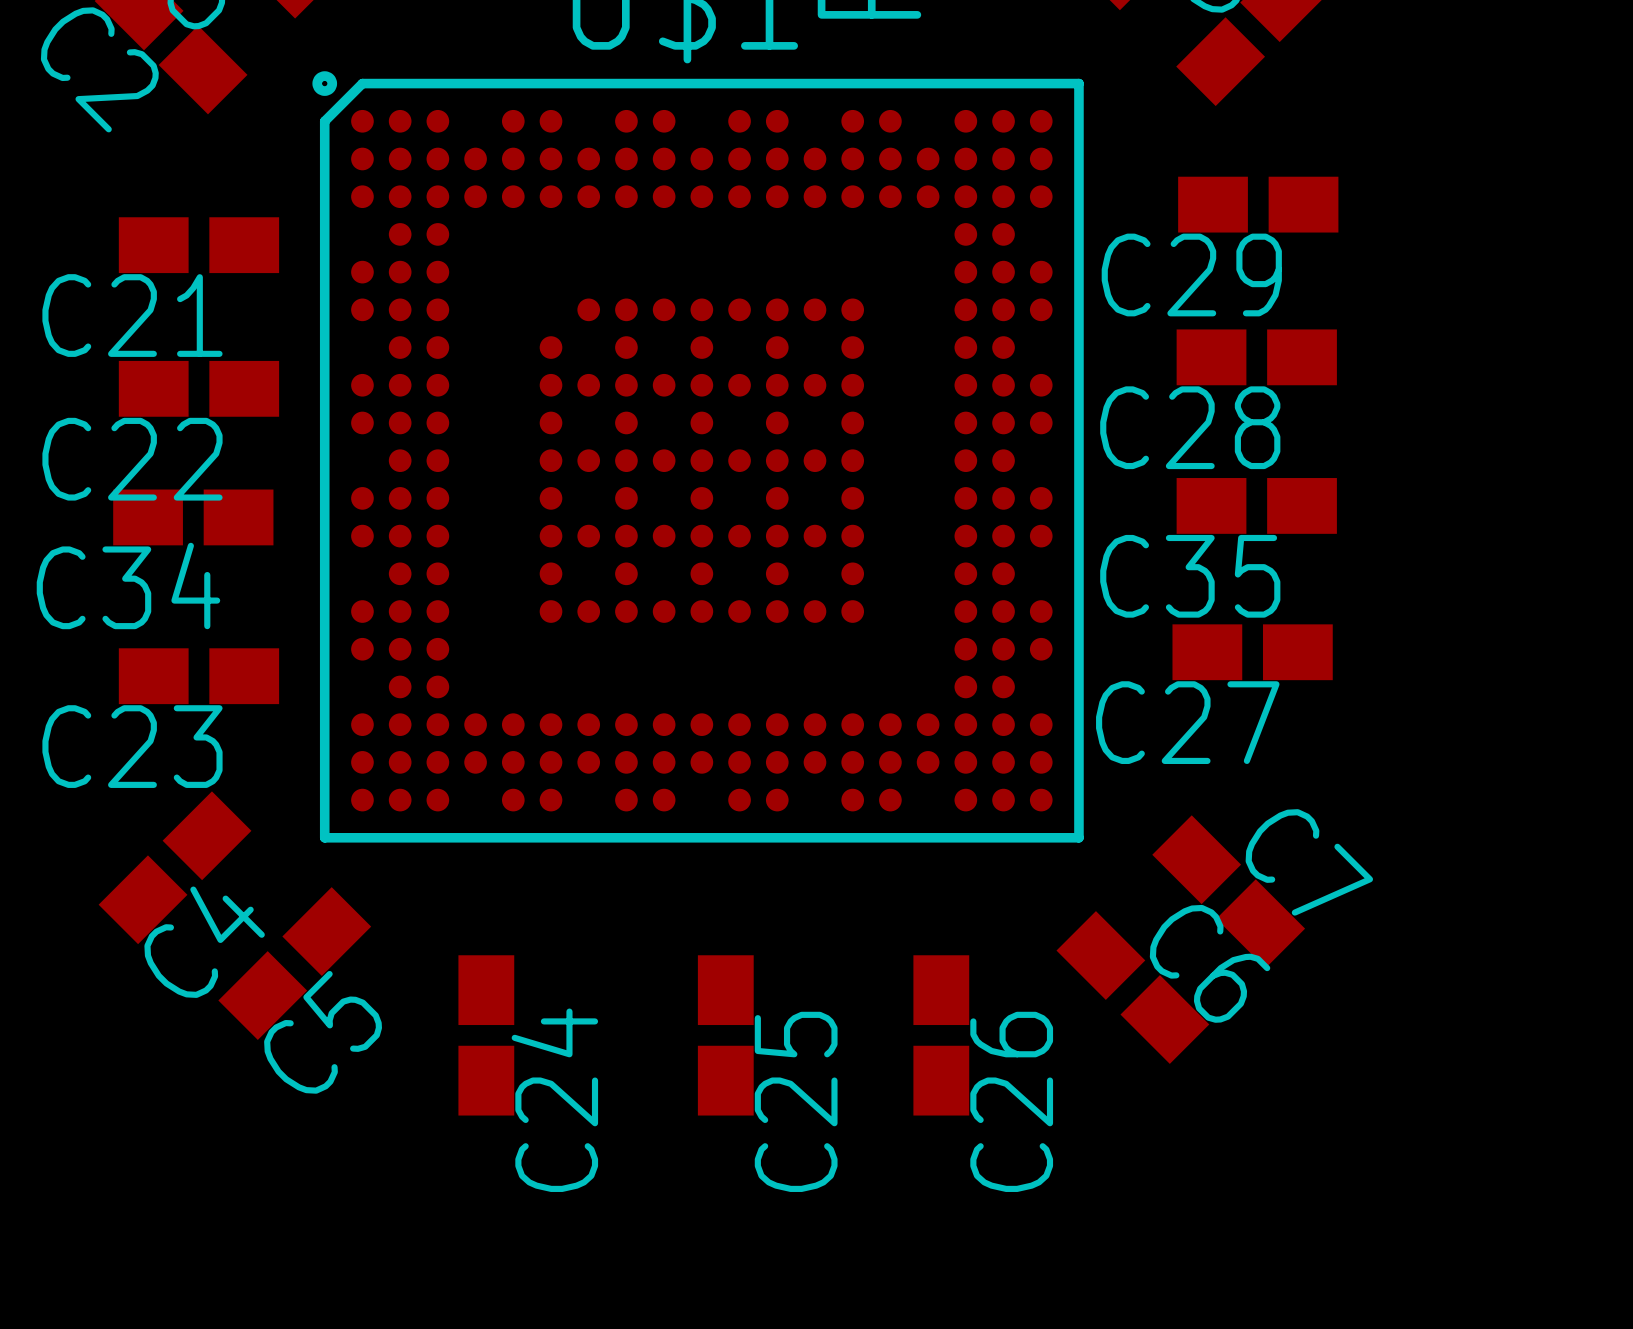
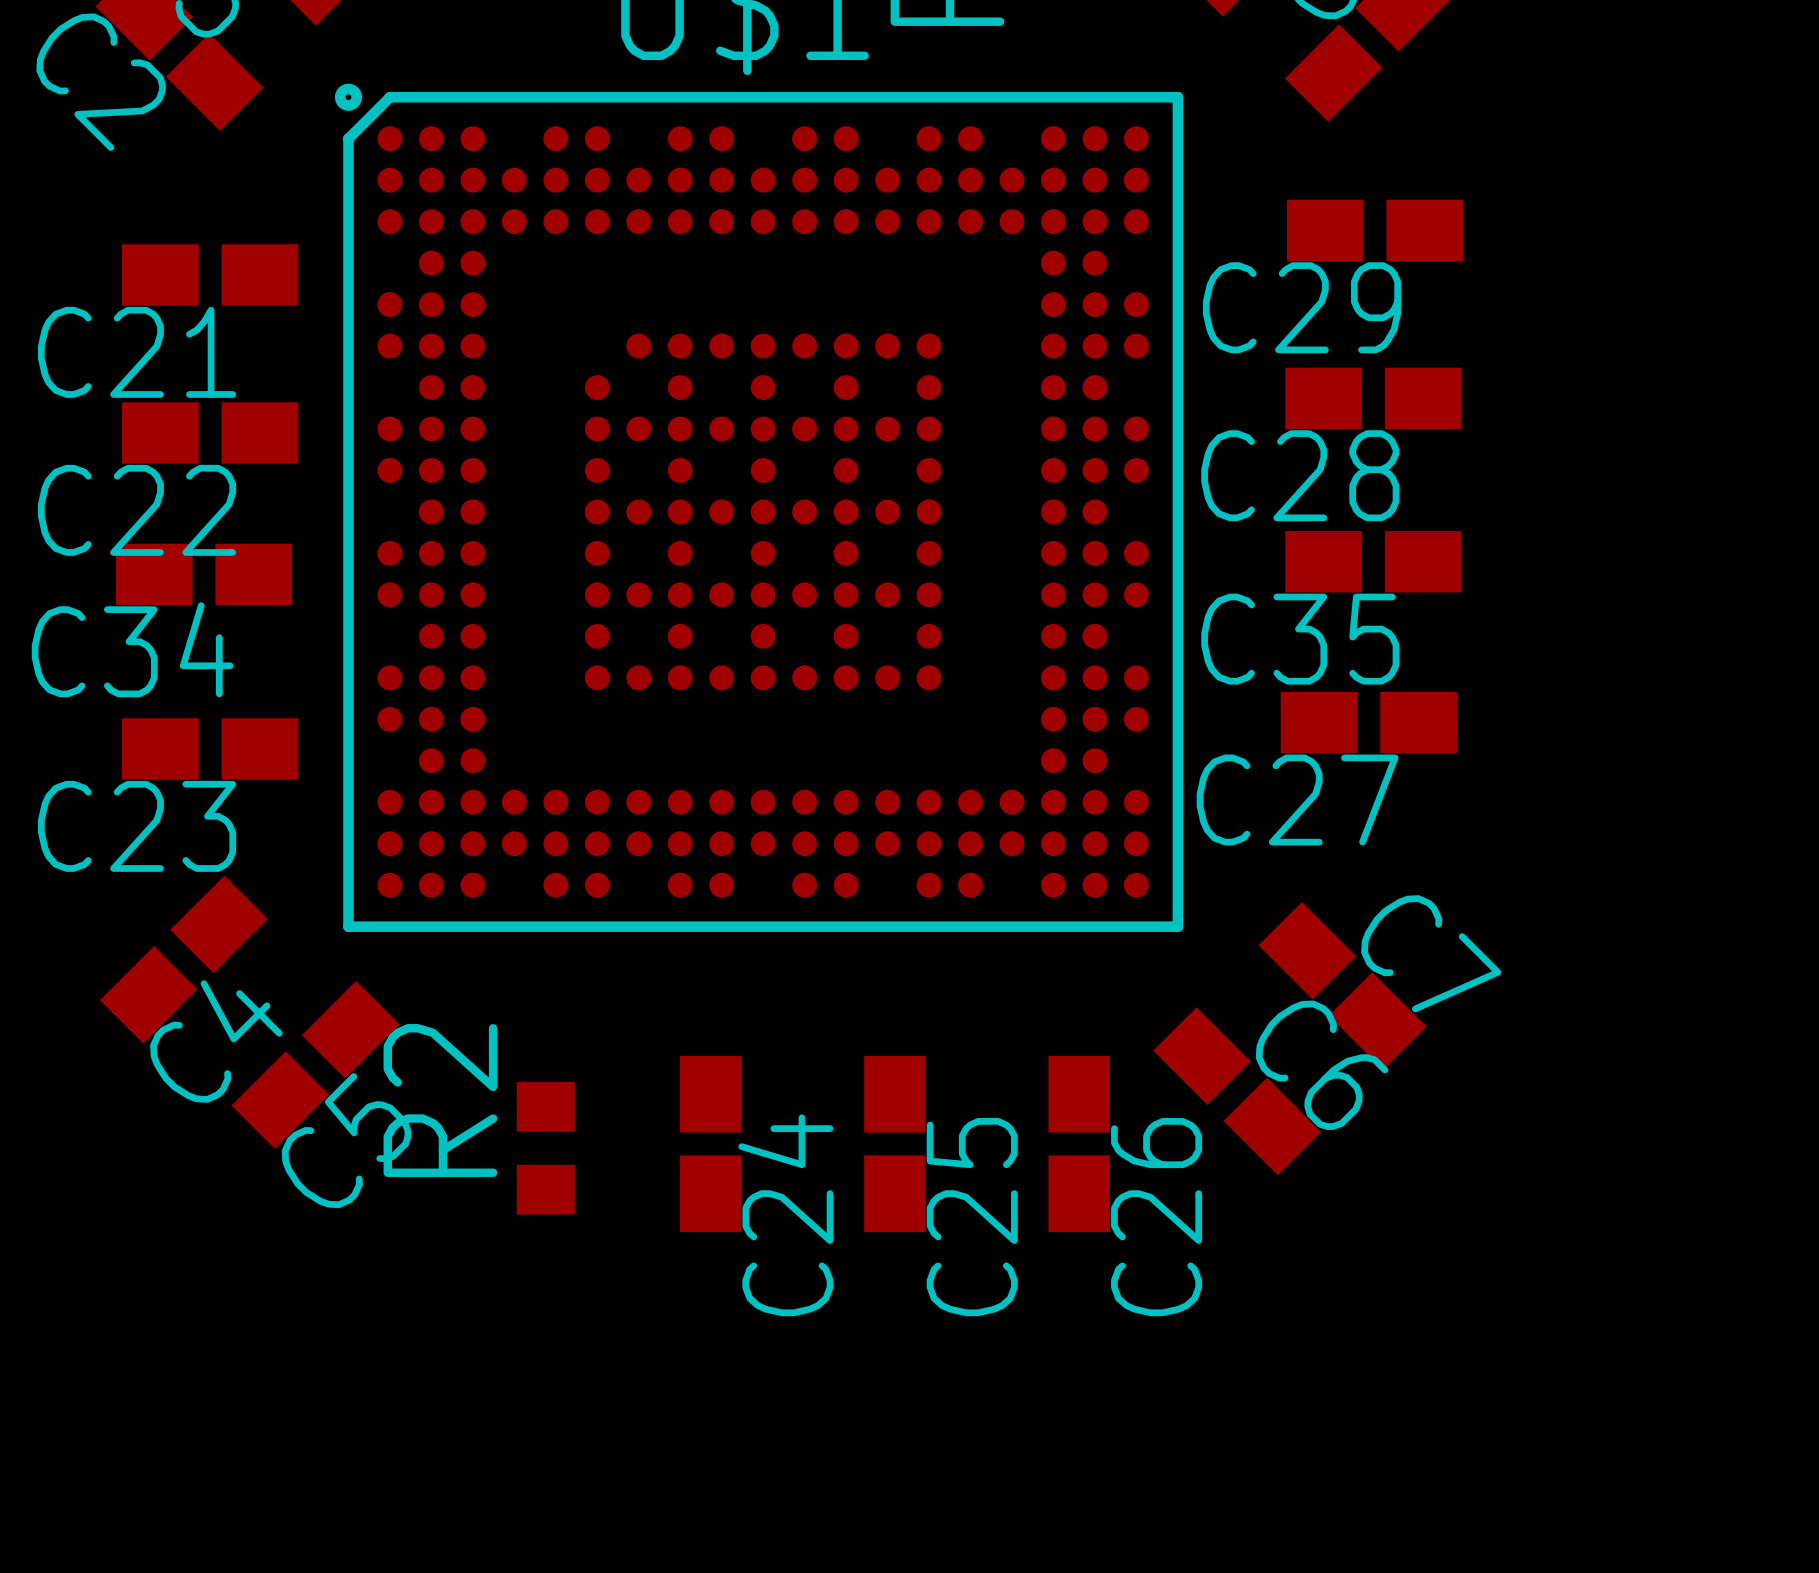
C24 position: (486, 1035) -> (710, 1143)
C25 position: (725, 1035) -> (894, 1143)
C26 position: (941, 1035) -> (1079, 1143)
R2: none -> (545, 1148)

